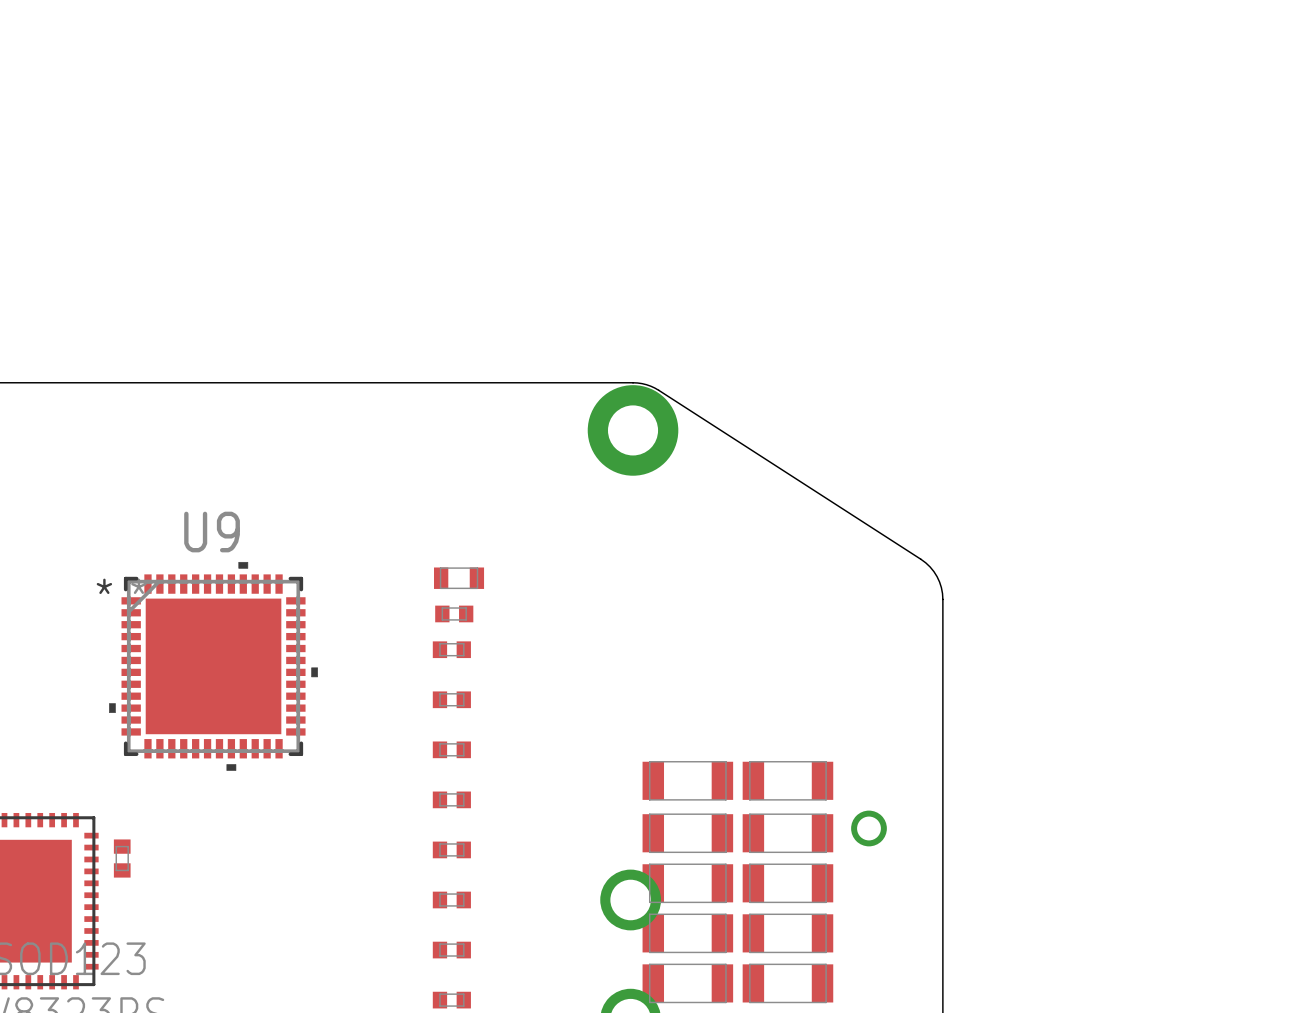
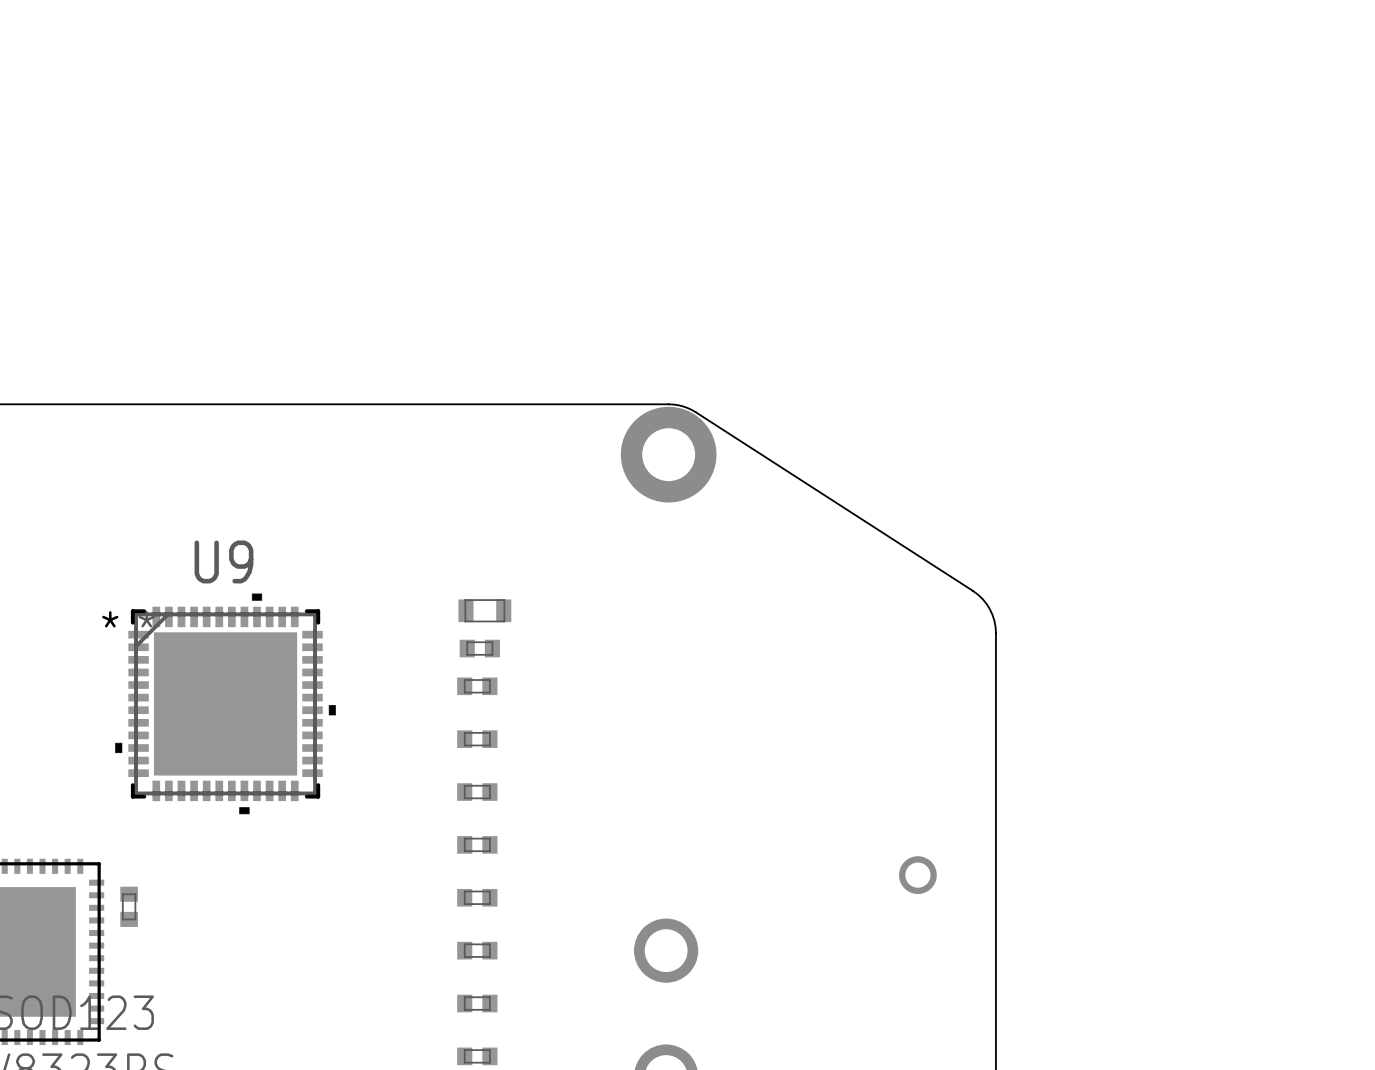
part: (687, 780) -> none
part: (787, 780) -> none
part: (687, 833) -> none
part: (787, 833) -> none
part: (687, 883) -> none
part: (787, 883) -> none
part: (687, 933) -> none
part: (787, 933) -> none
part: (687, 983) -> none
part: (787, 983) -> none

